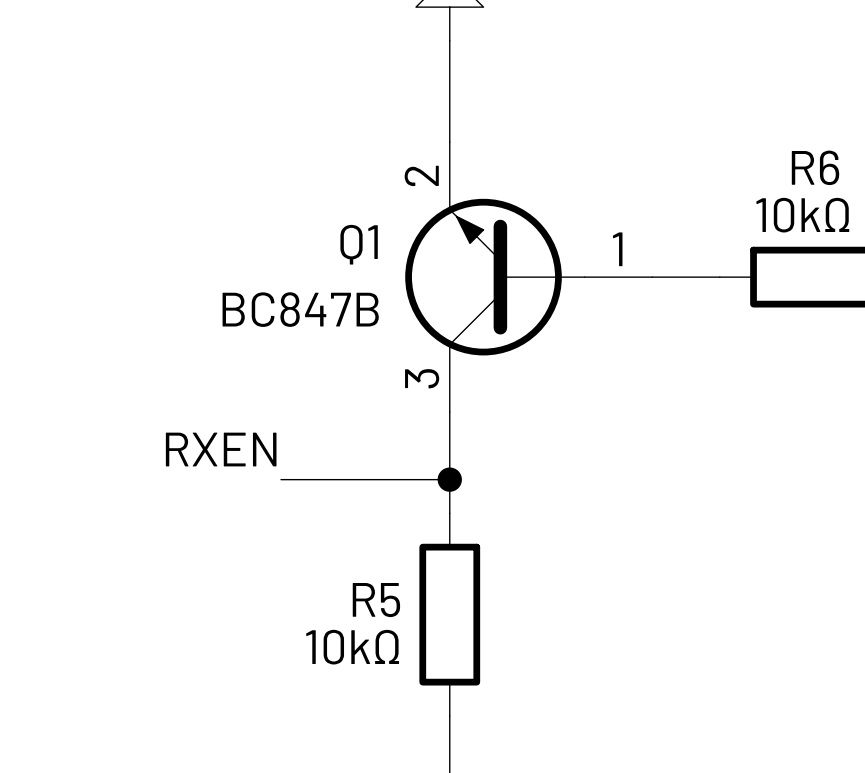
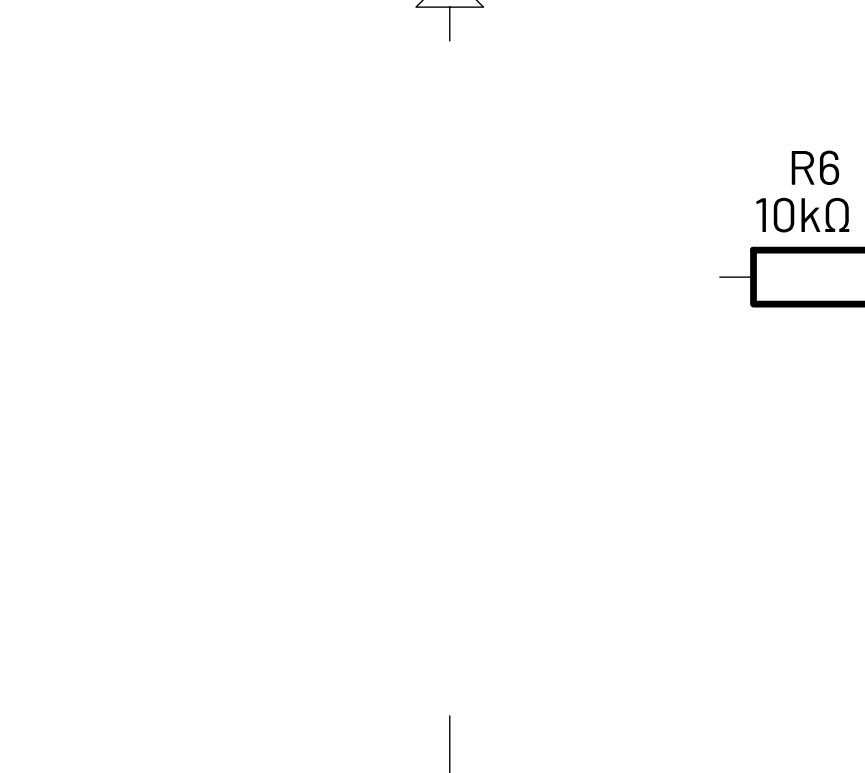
wire: (449, 40) (449, 142) -> none
Q1: BC847B (528, 277) -> none
wire: (652, 277) (719, 277) -> none
wire: (449, 412) (449, 513) -> none
label: RXEN (221, 449) -> none
wire: (281, 479) (449, 479) -> none
junction: (449, 479) -> none
R5: 10kΩ (449, 614) -> none

